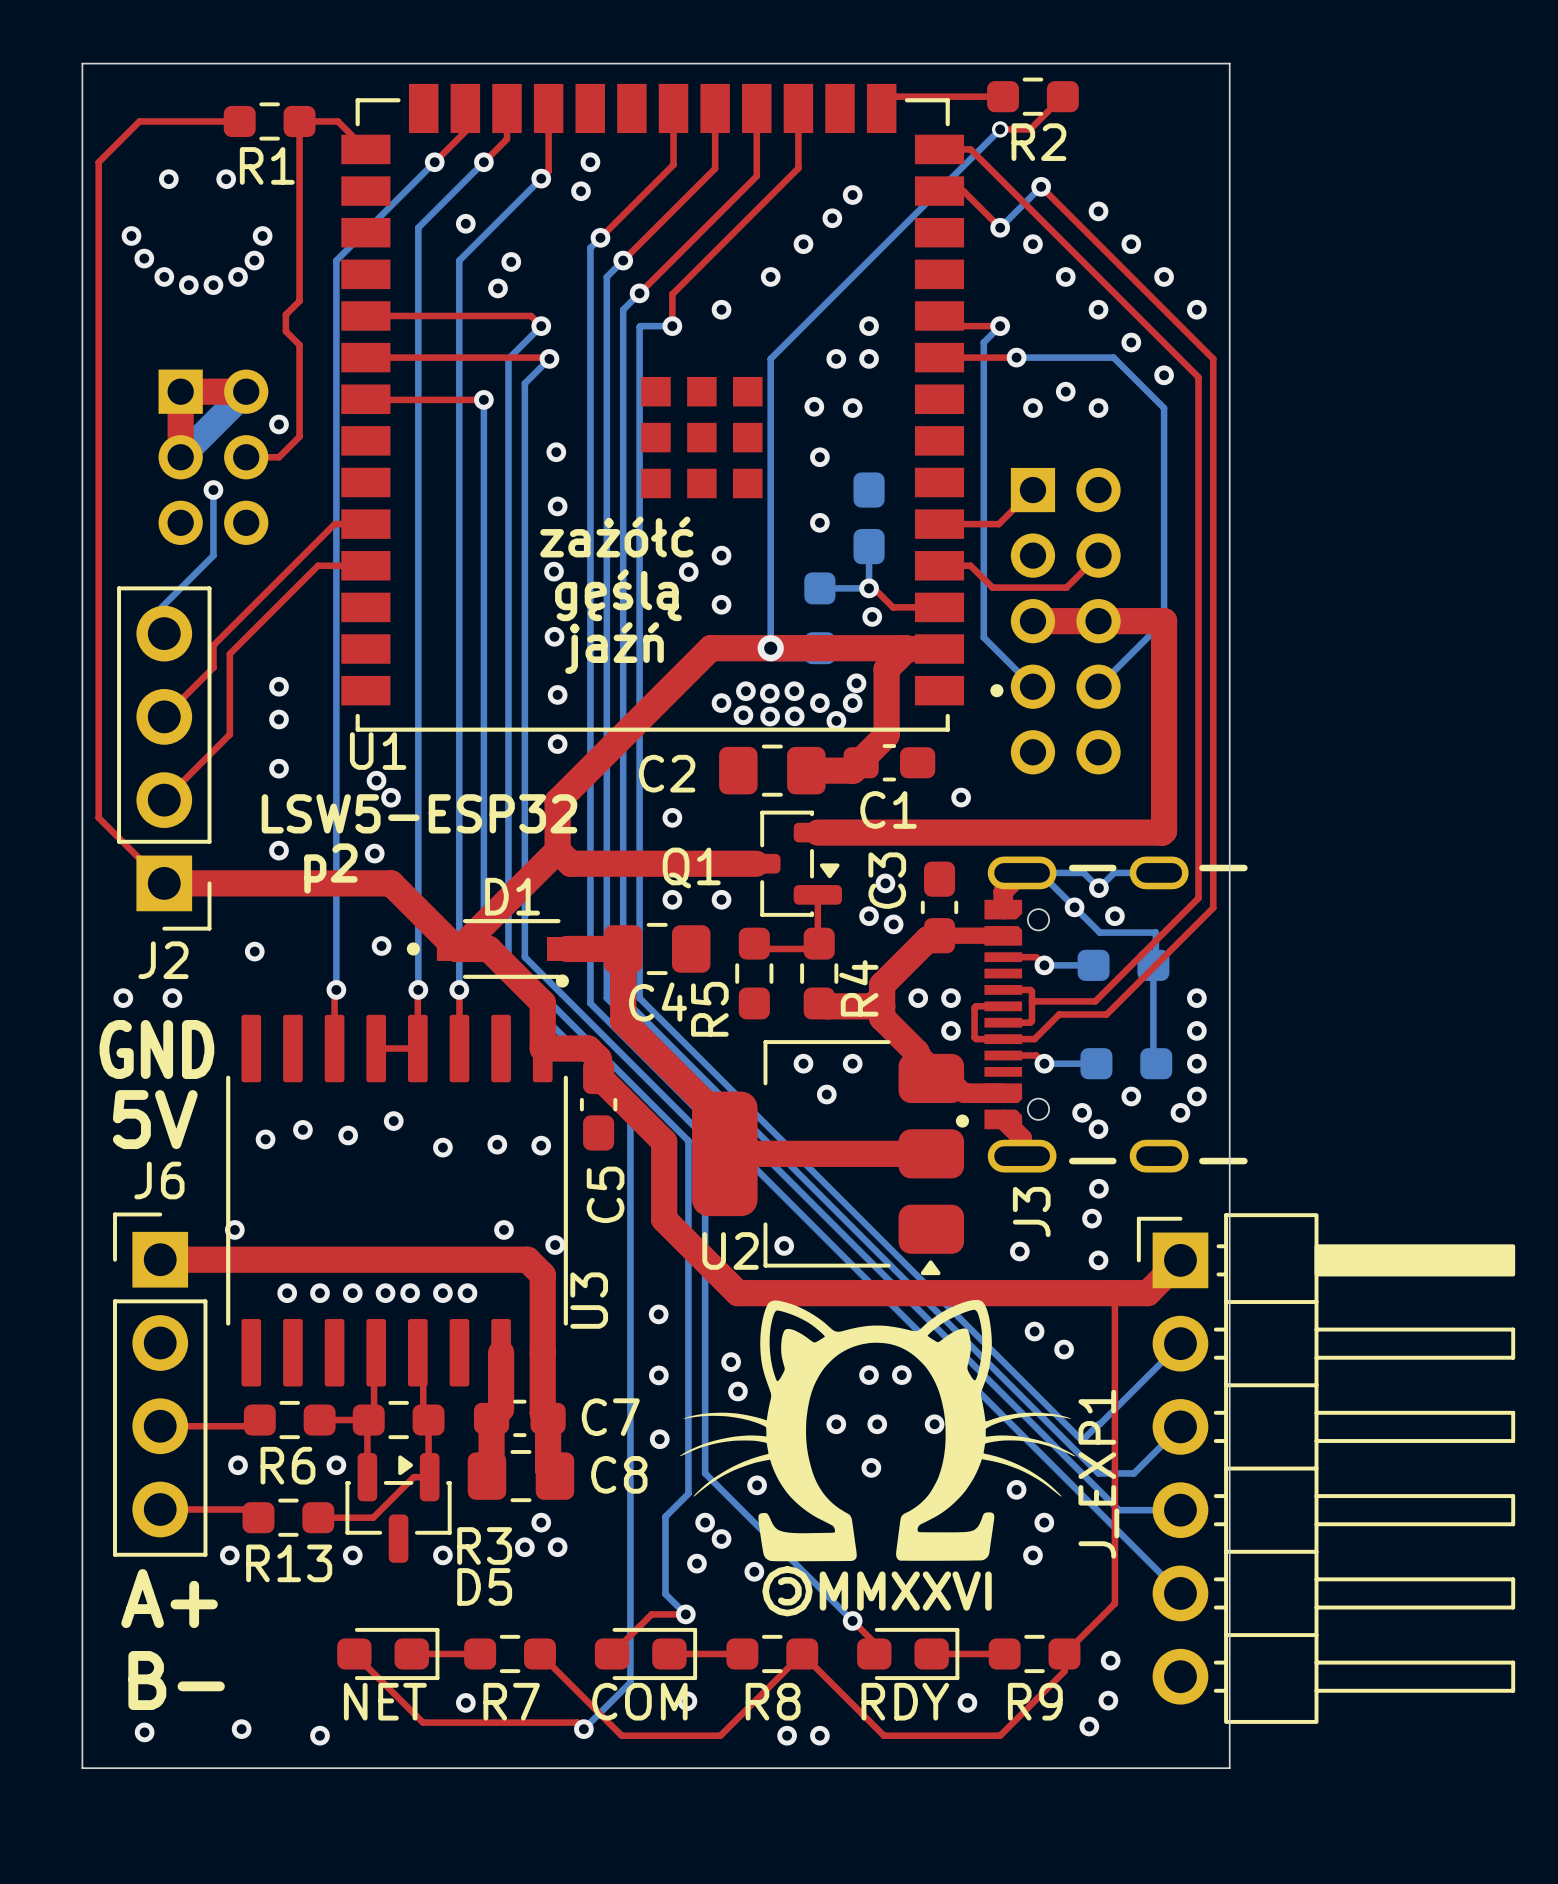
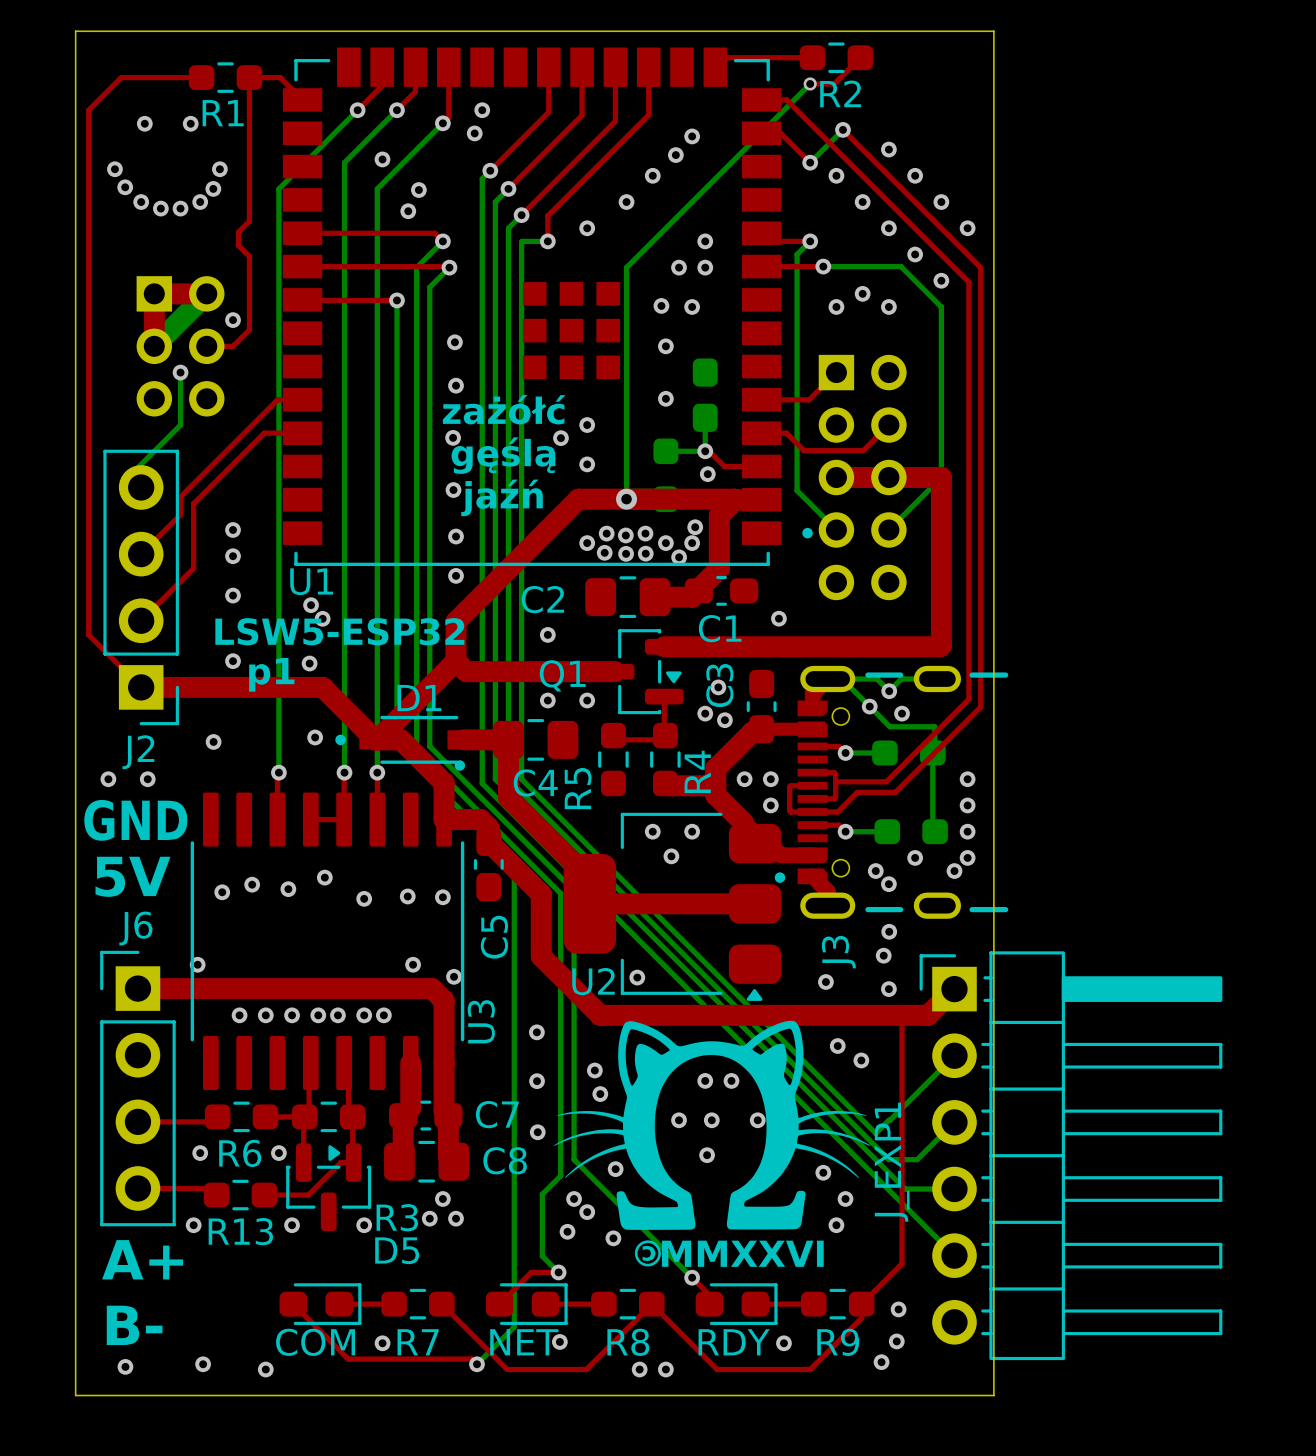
text: p2 (330, 868) -> p1 (271, 674)
part value: NET (385, 1701) -> COM (315, 1342)
part value: COM (639, 1701) -> NET (524, 1342)

